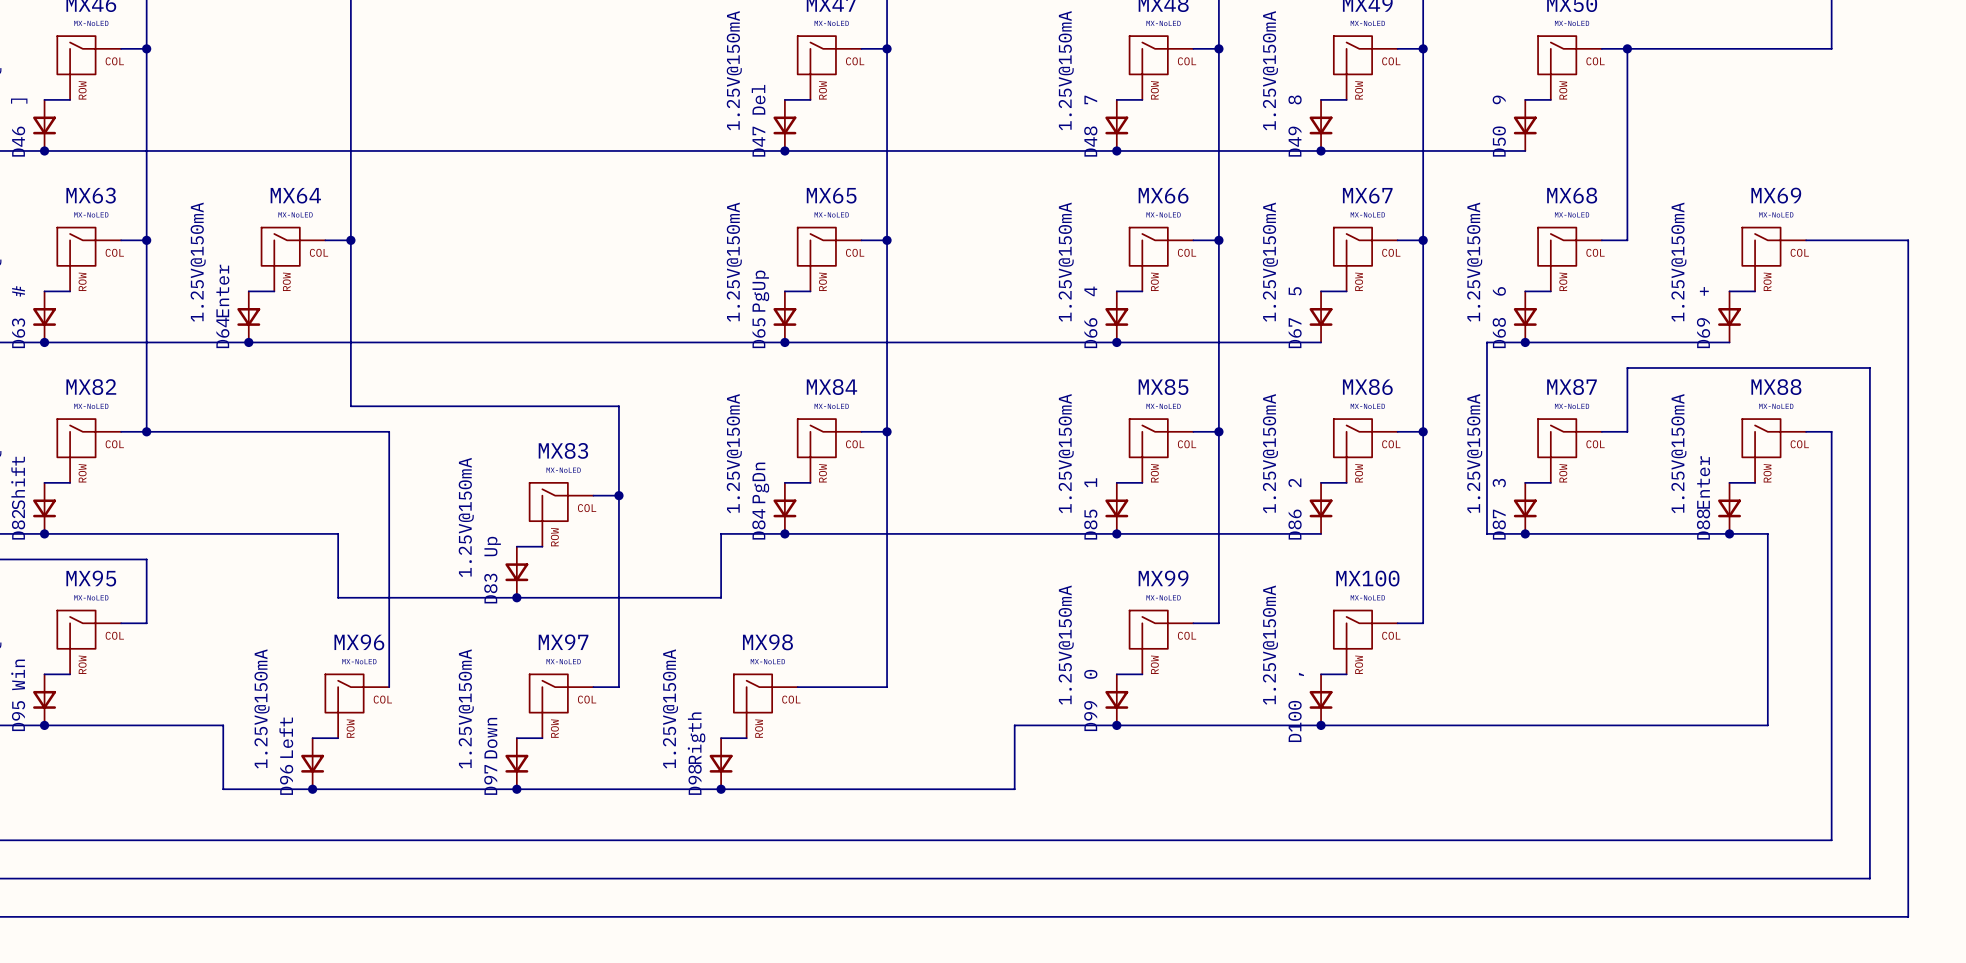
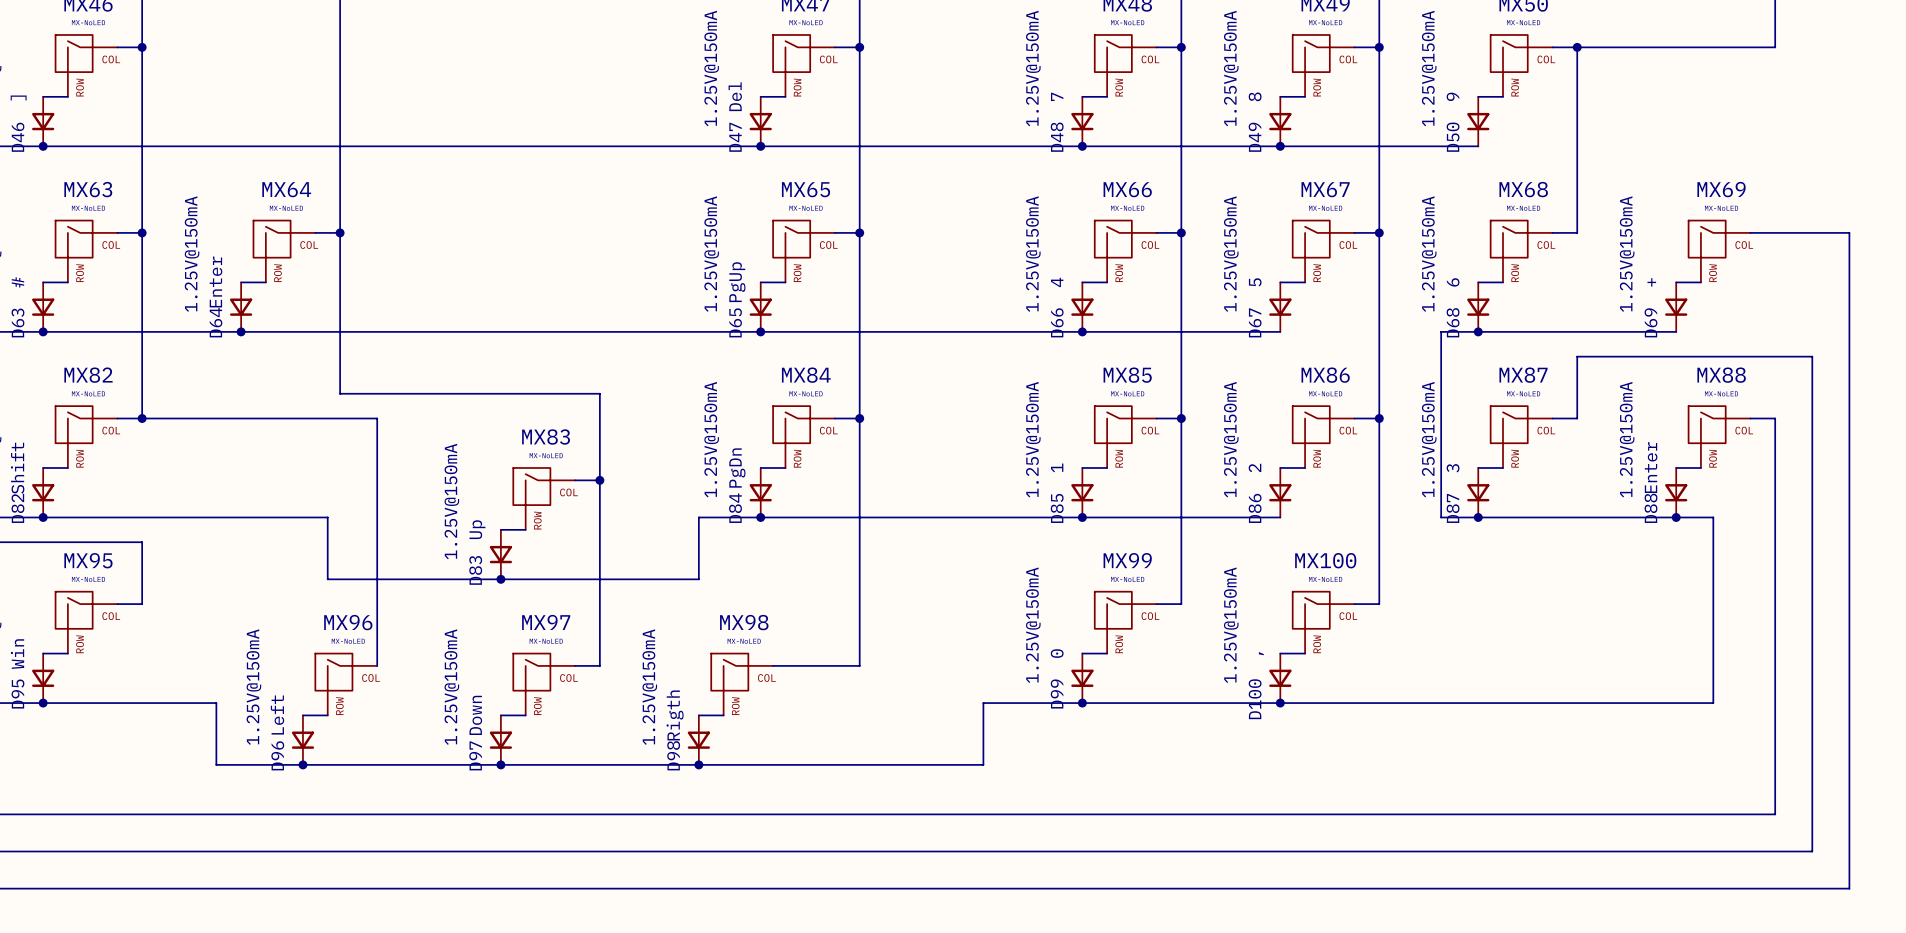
D50 value: none -> 1.25V@150mA (1429, 68)

